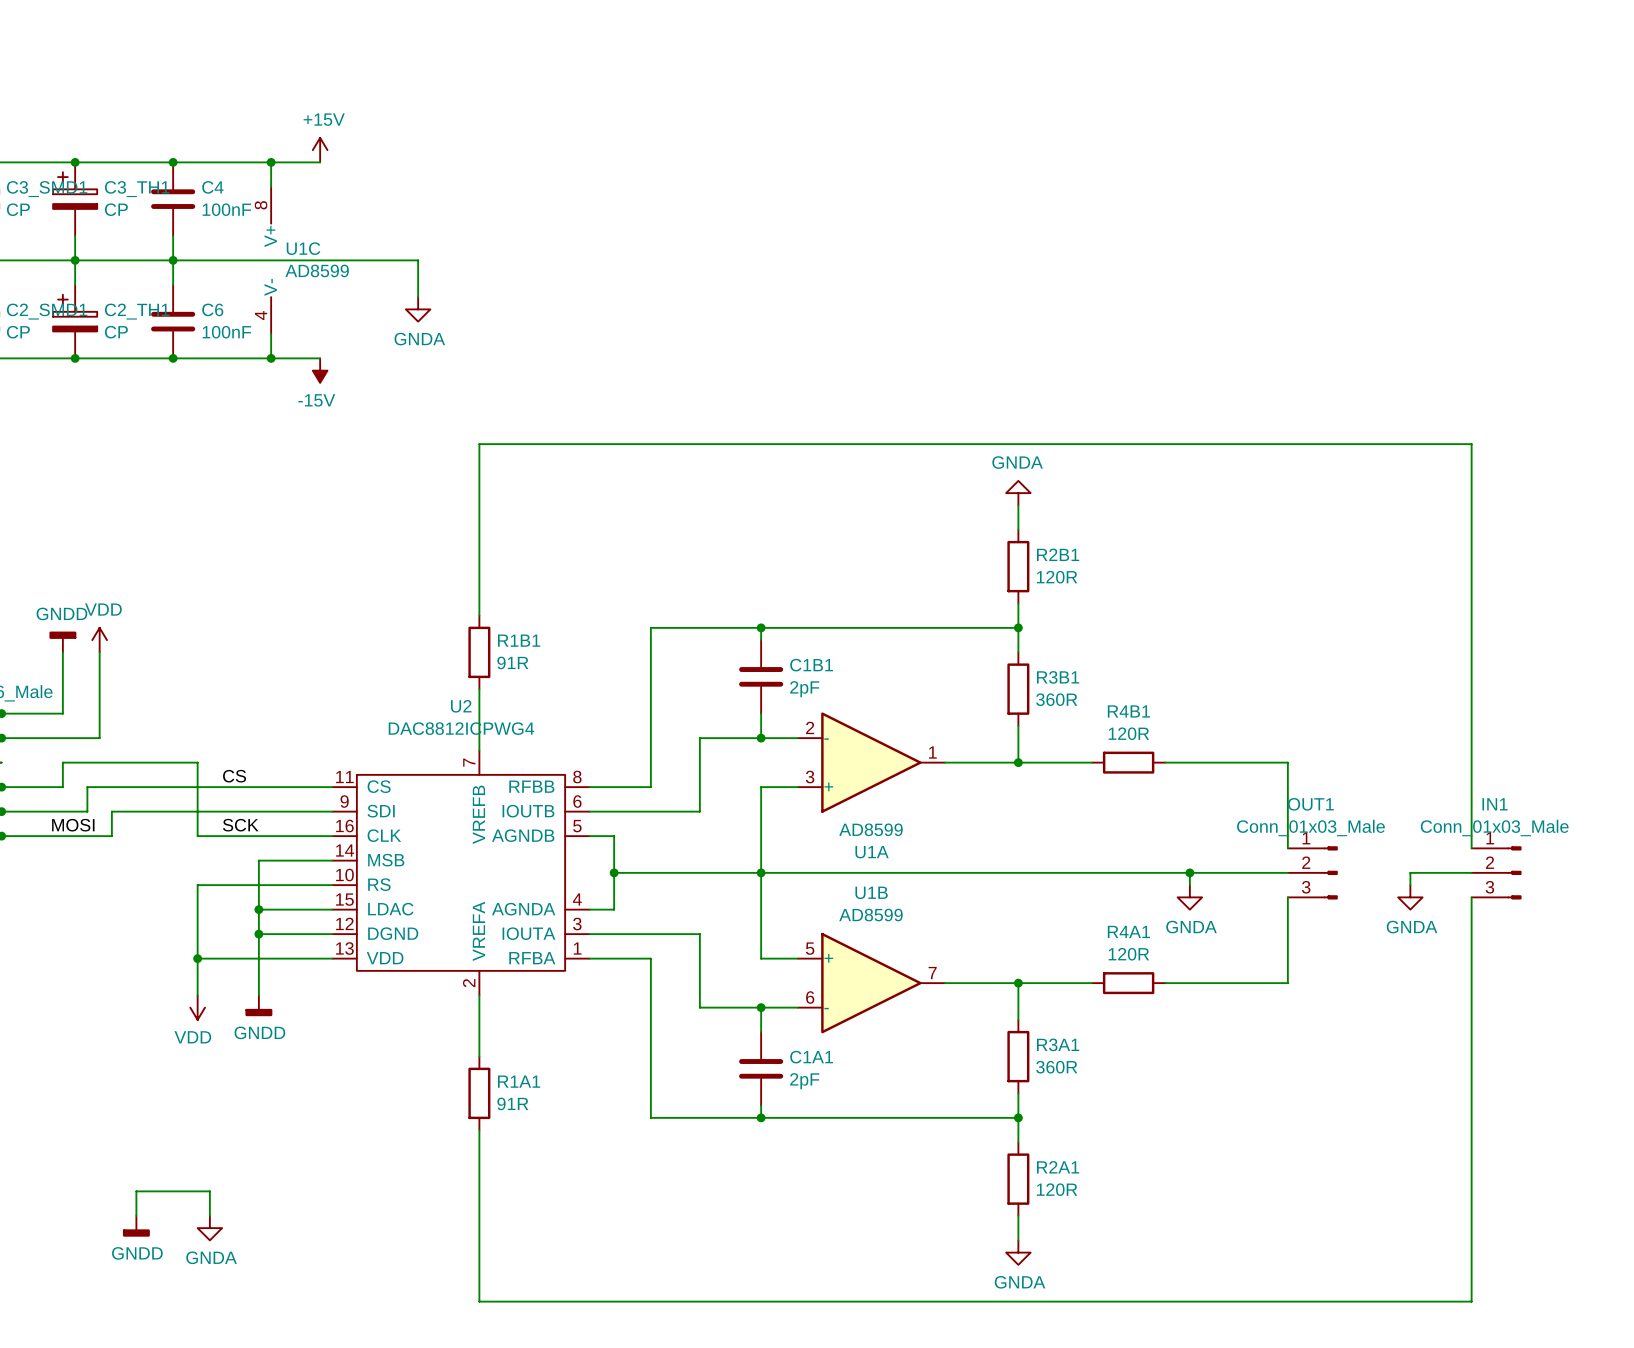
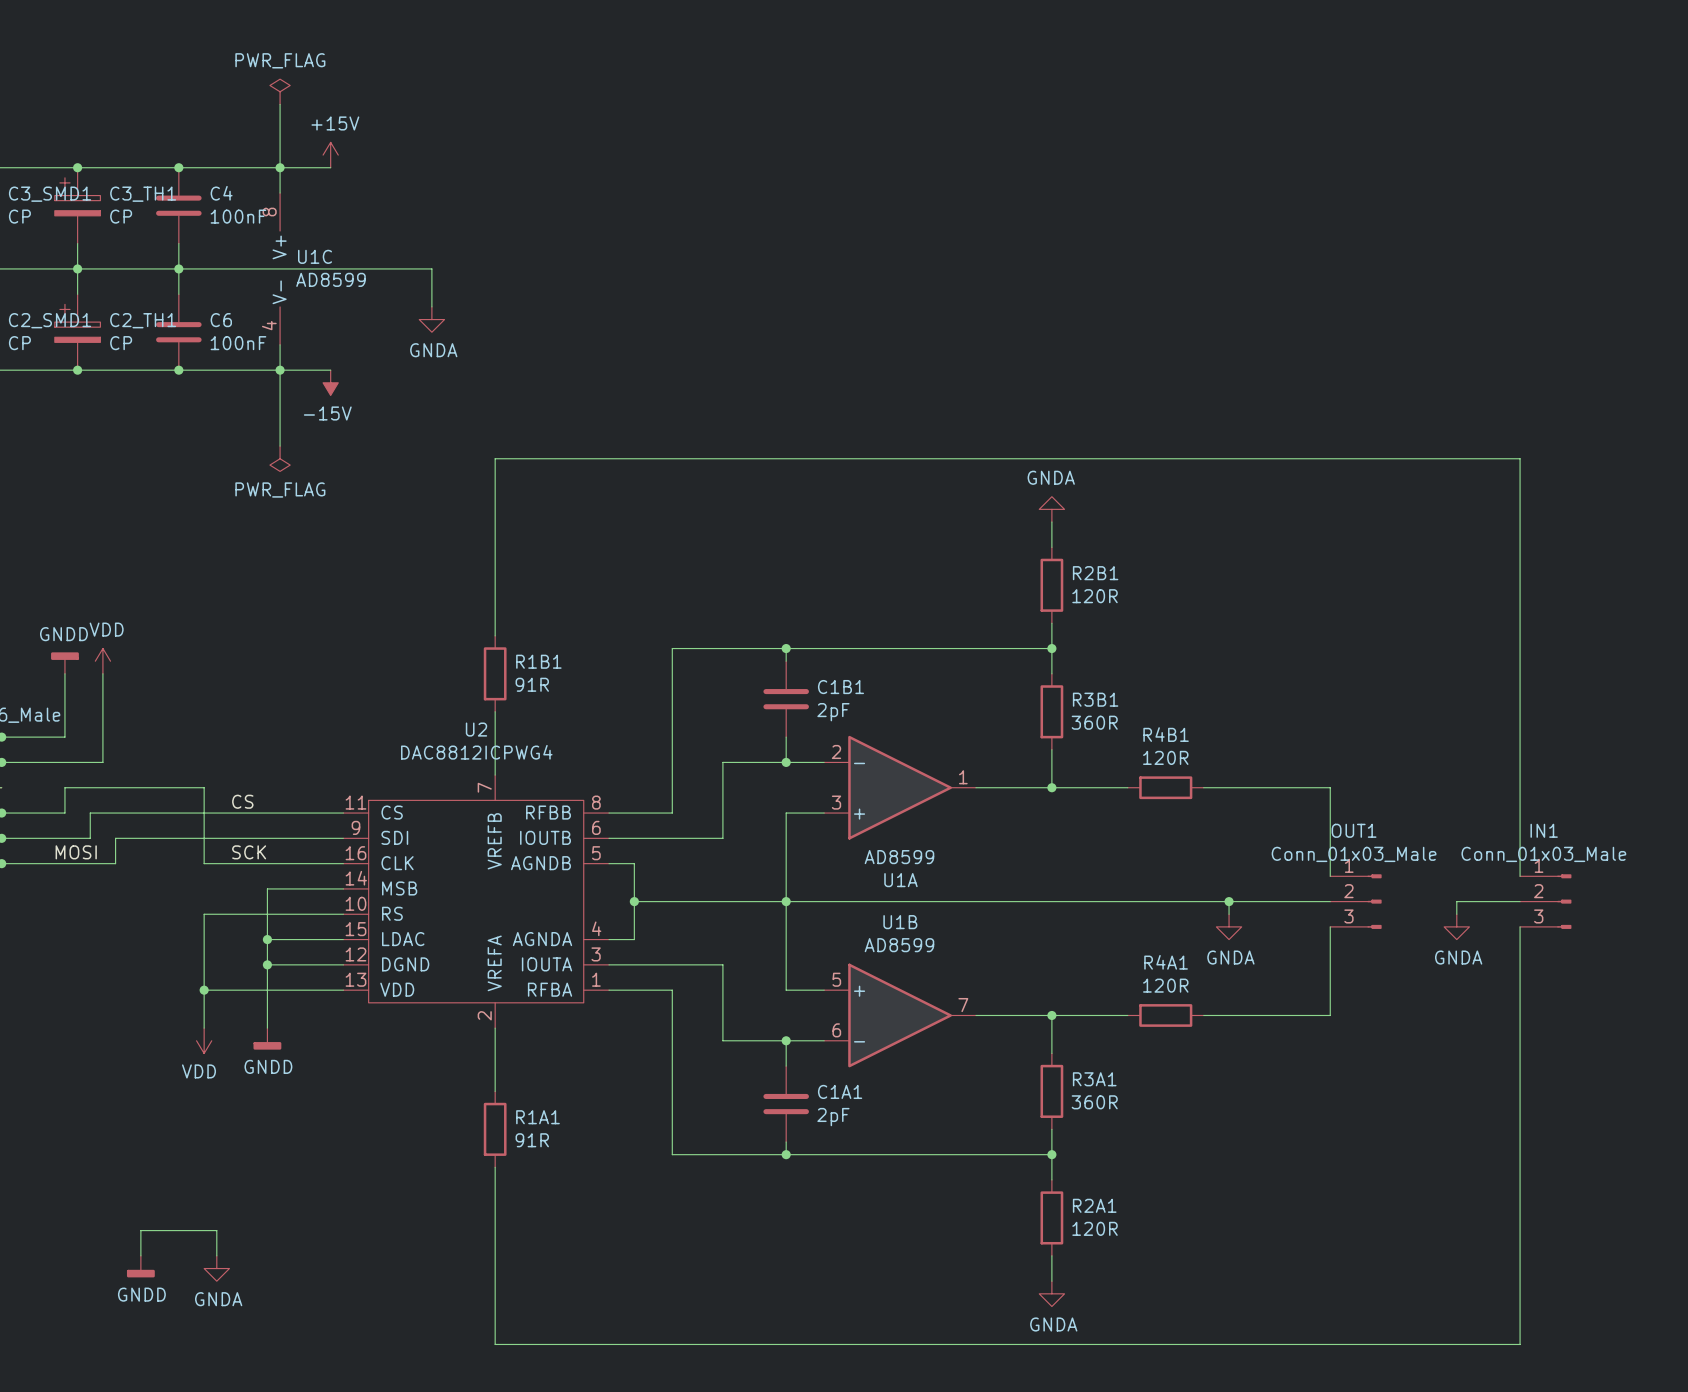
power symbol: none -> PWR_FLAG (280, 91)
wire: none -> (280, 104) (280, 167)
wire: none -> (280, 370) (280, 446)
power symbol: none -> PWR_FLAG (280, 458)

